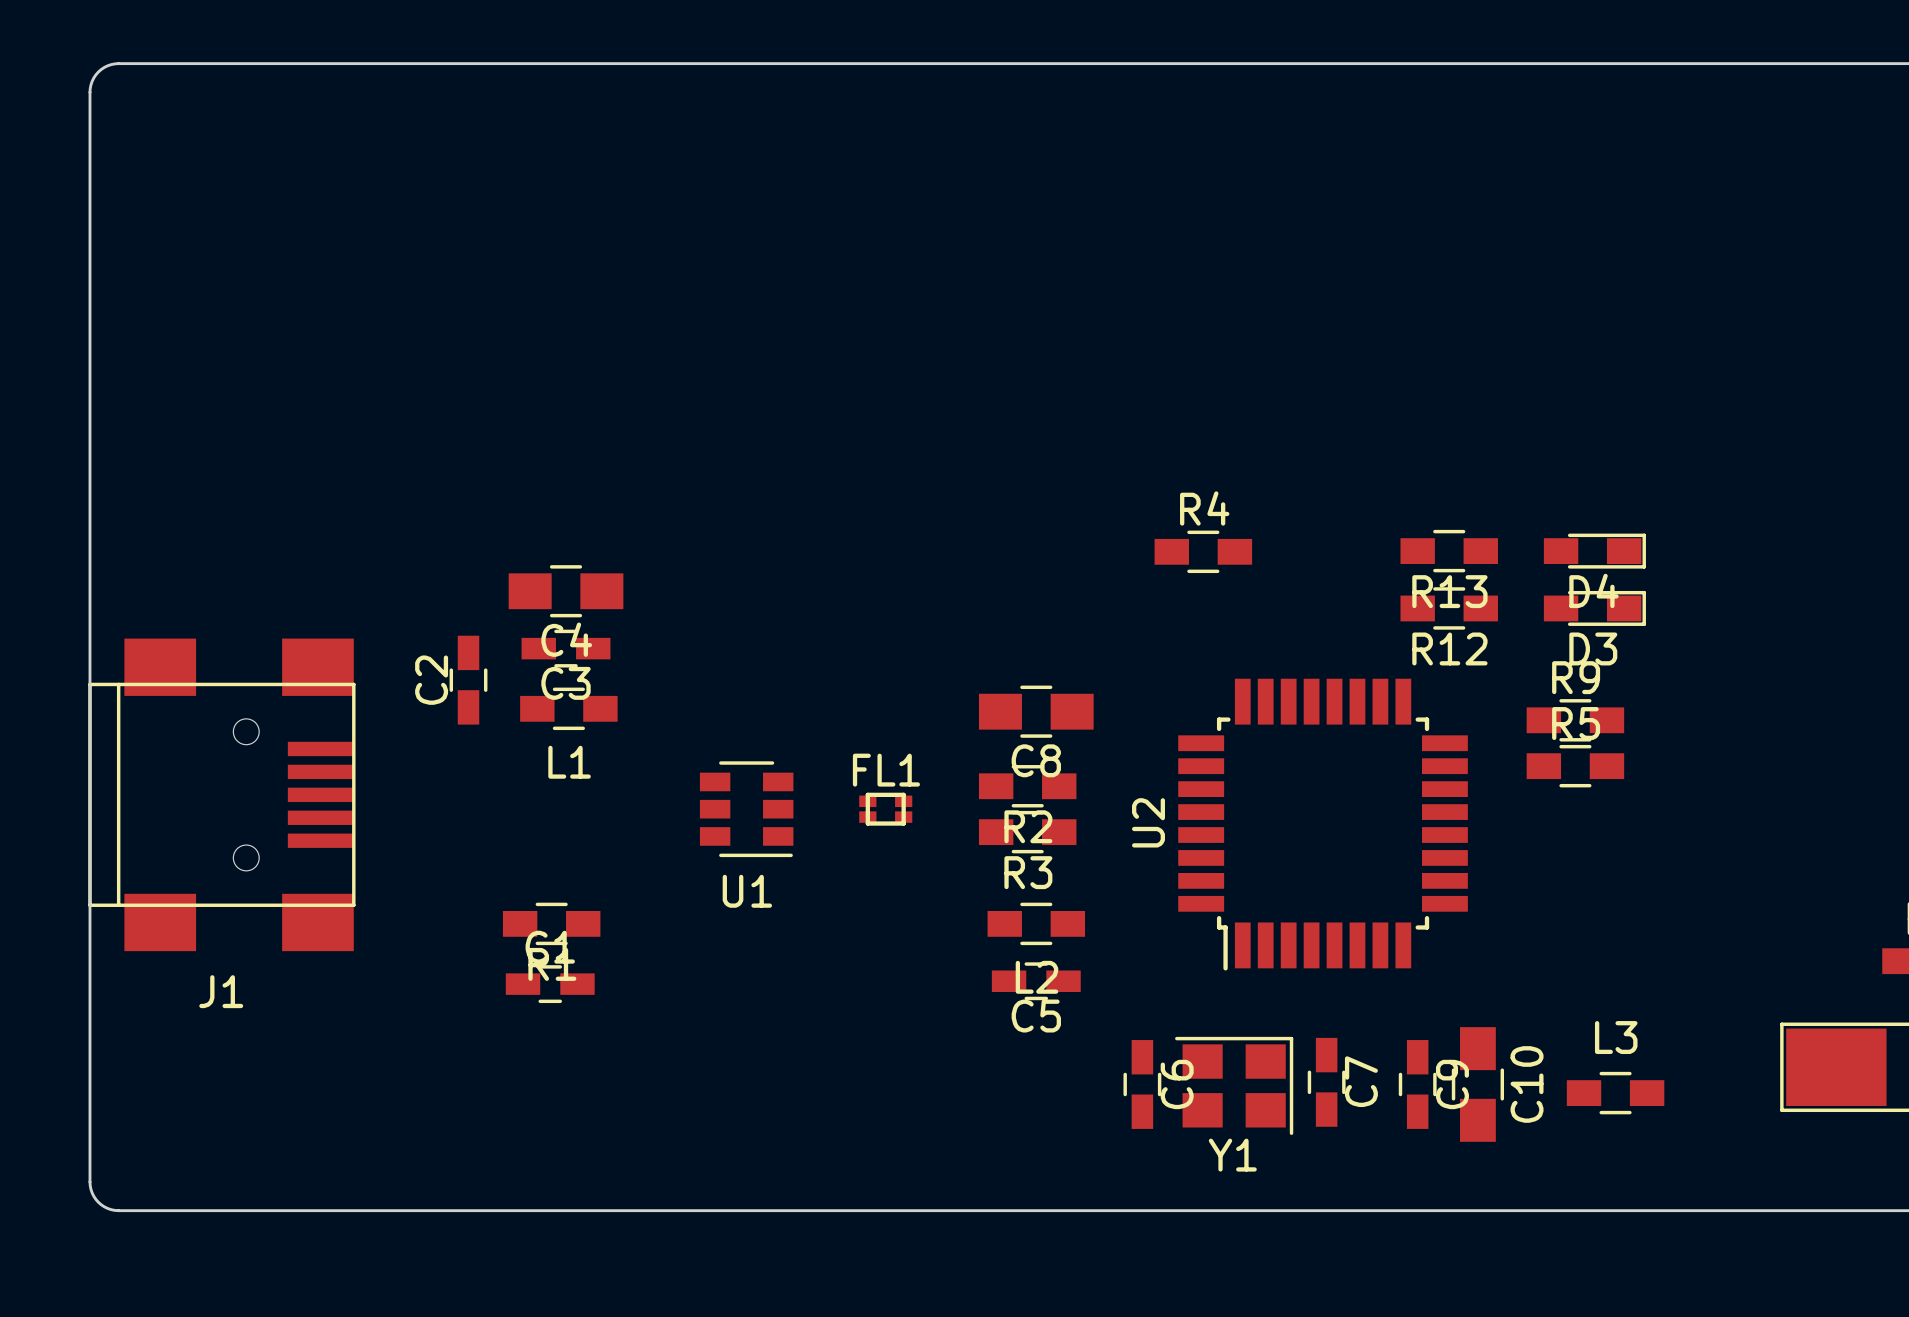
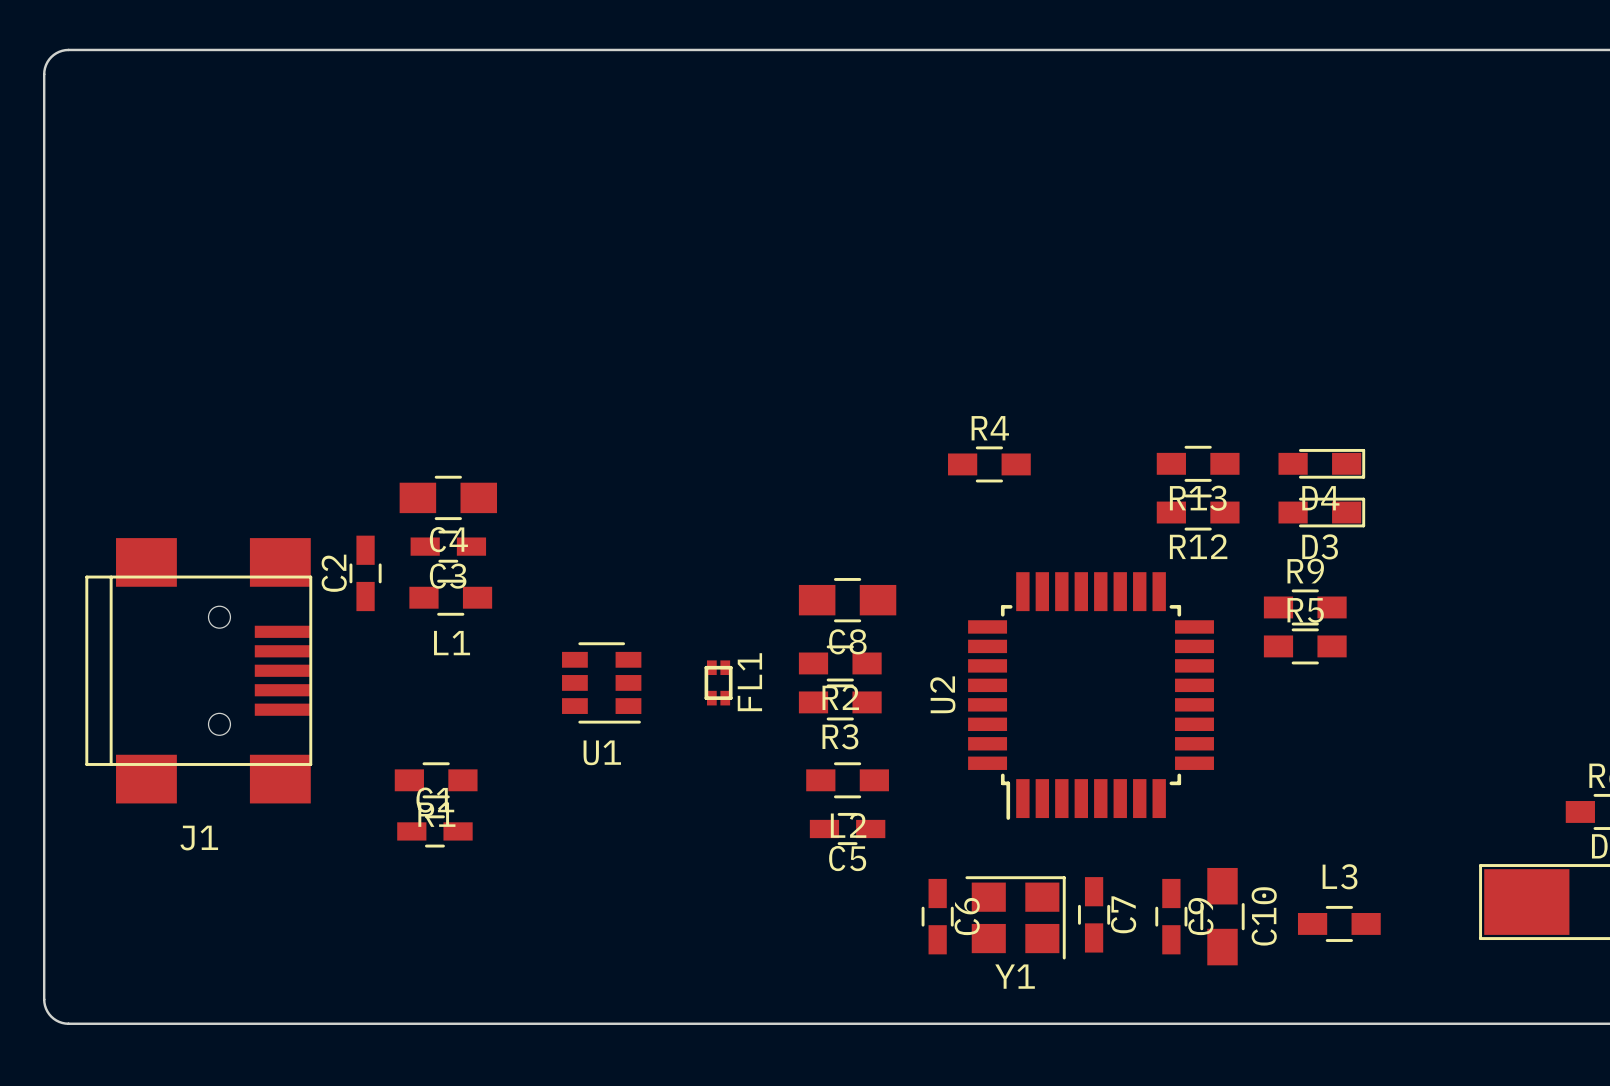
J1 position: (221, 794) -> (198, 670)
FL1 rotation: 0° (885, 809) -> 90° clockwise (718, 682)

